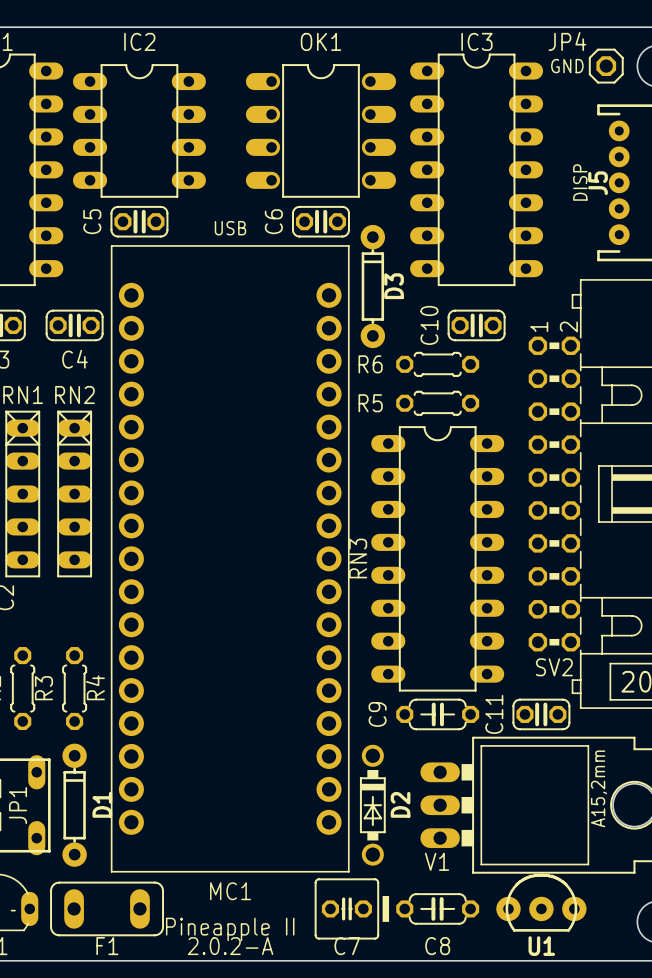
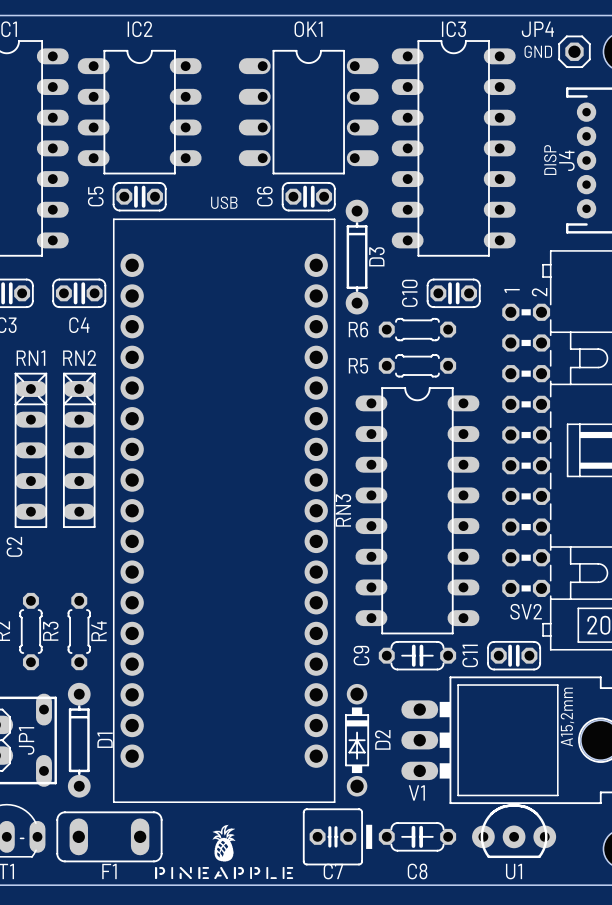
J5 name: J5 (598, 183) -> J4 (566, 160)
text: MC1 (230, 891) -> none
drawing: none -> [155, 824, 294, 879]
text: Pineapple II (230, 929) -> none
text: 2.0.2-A (230, 946) -> none

